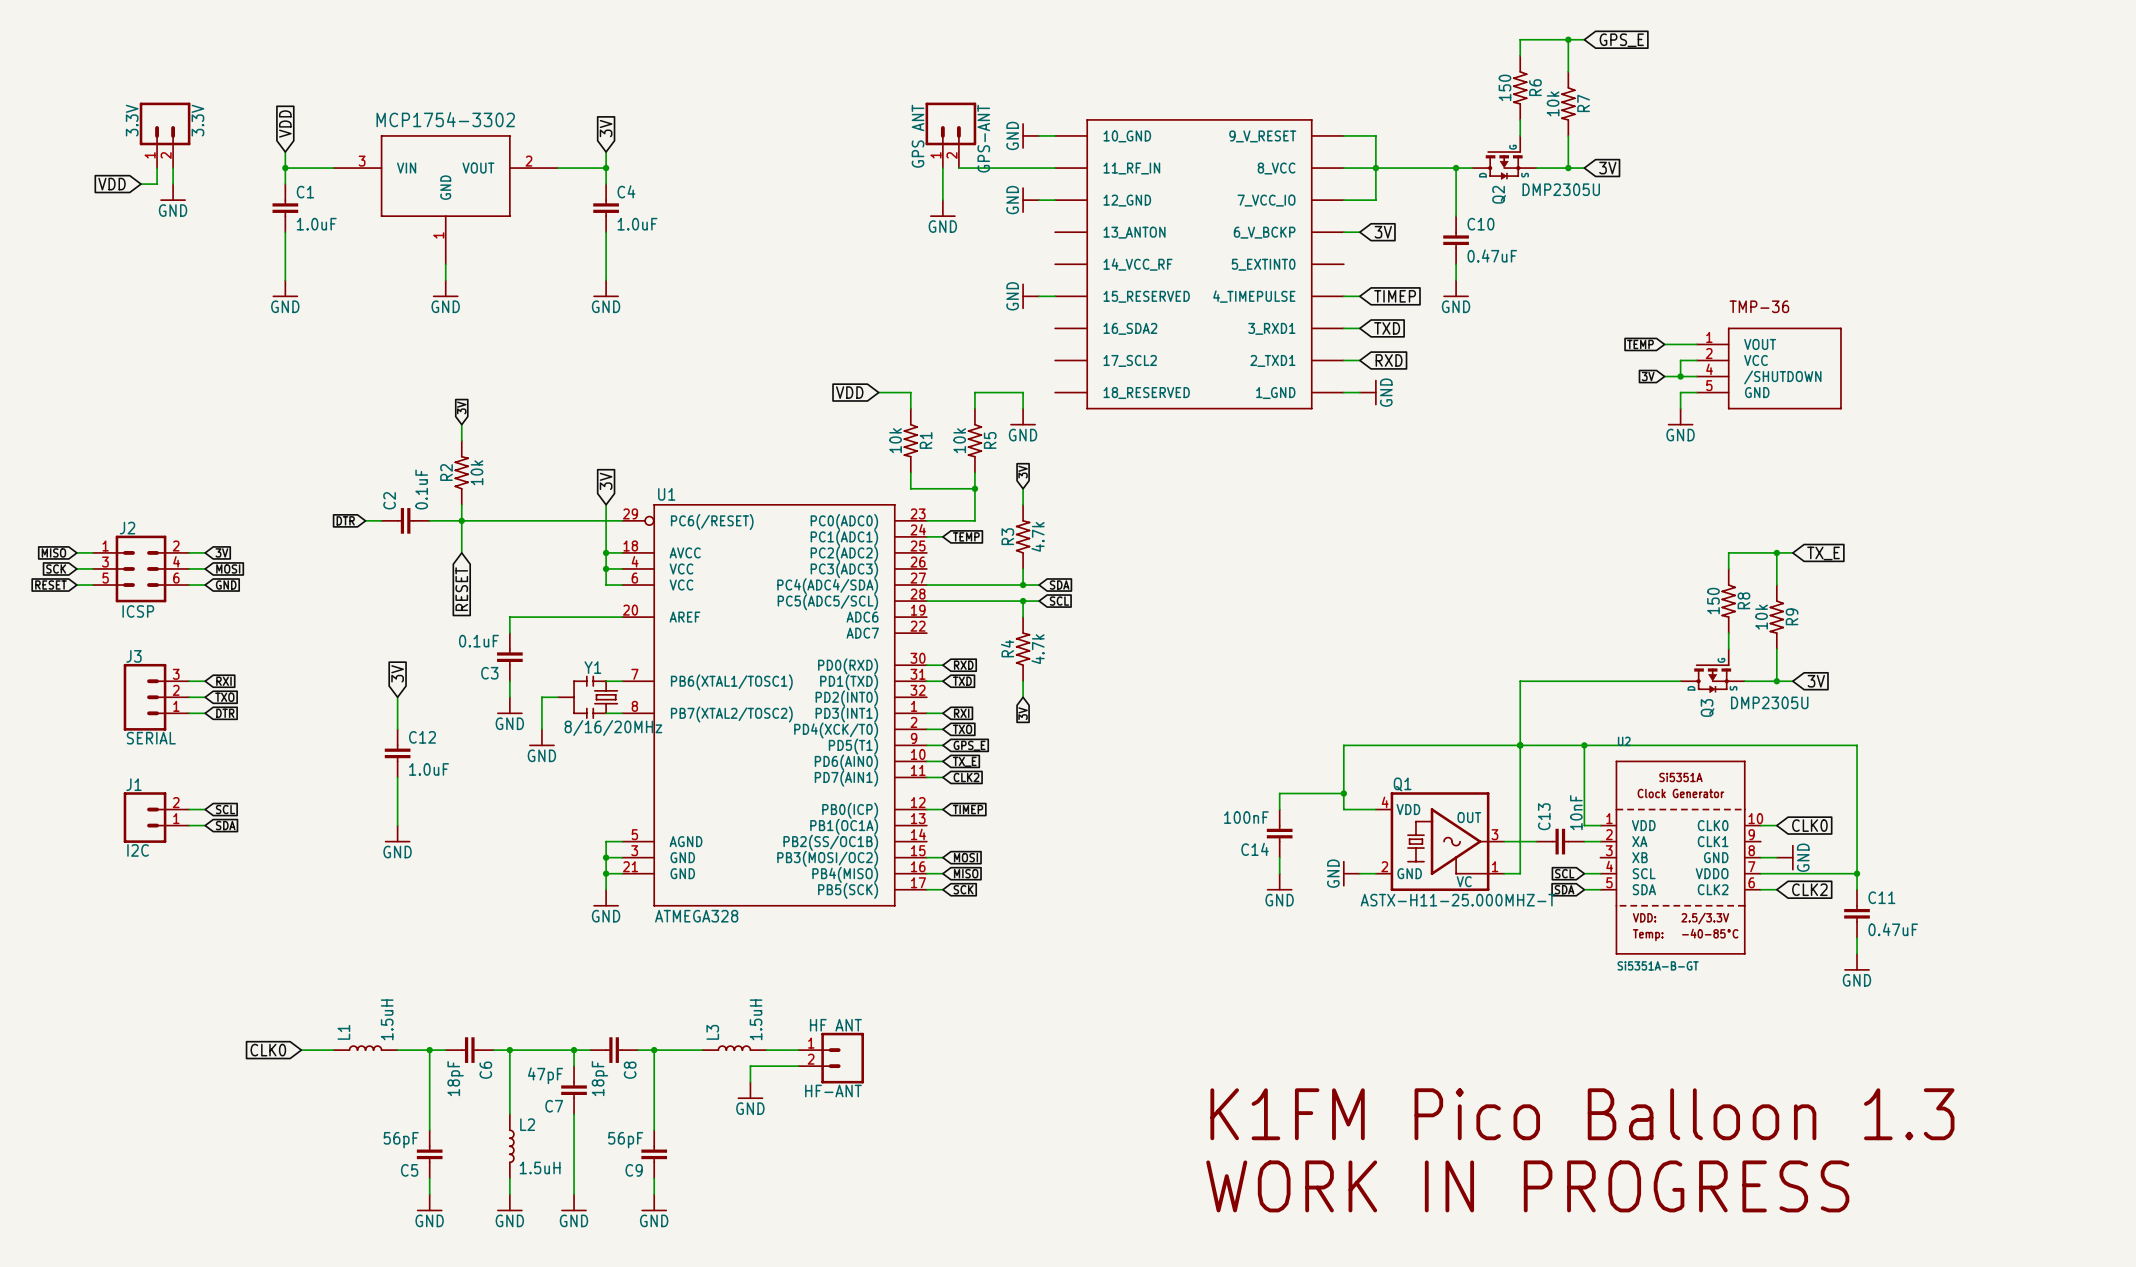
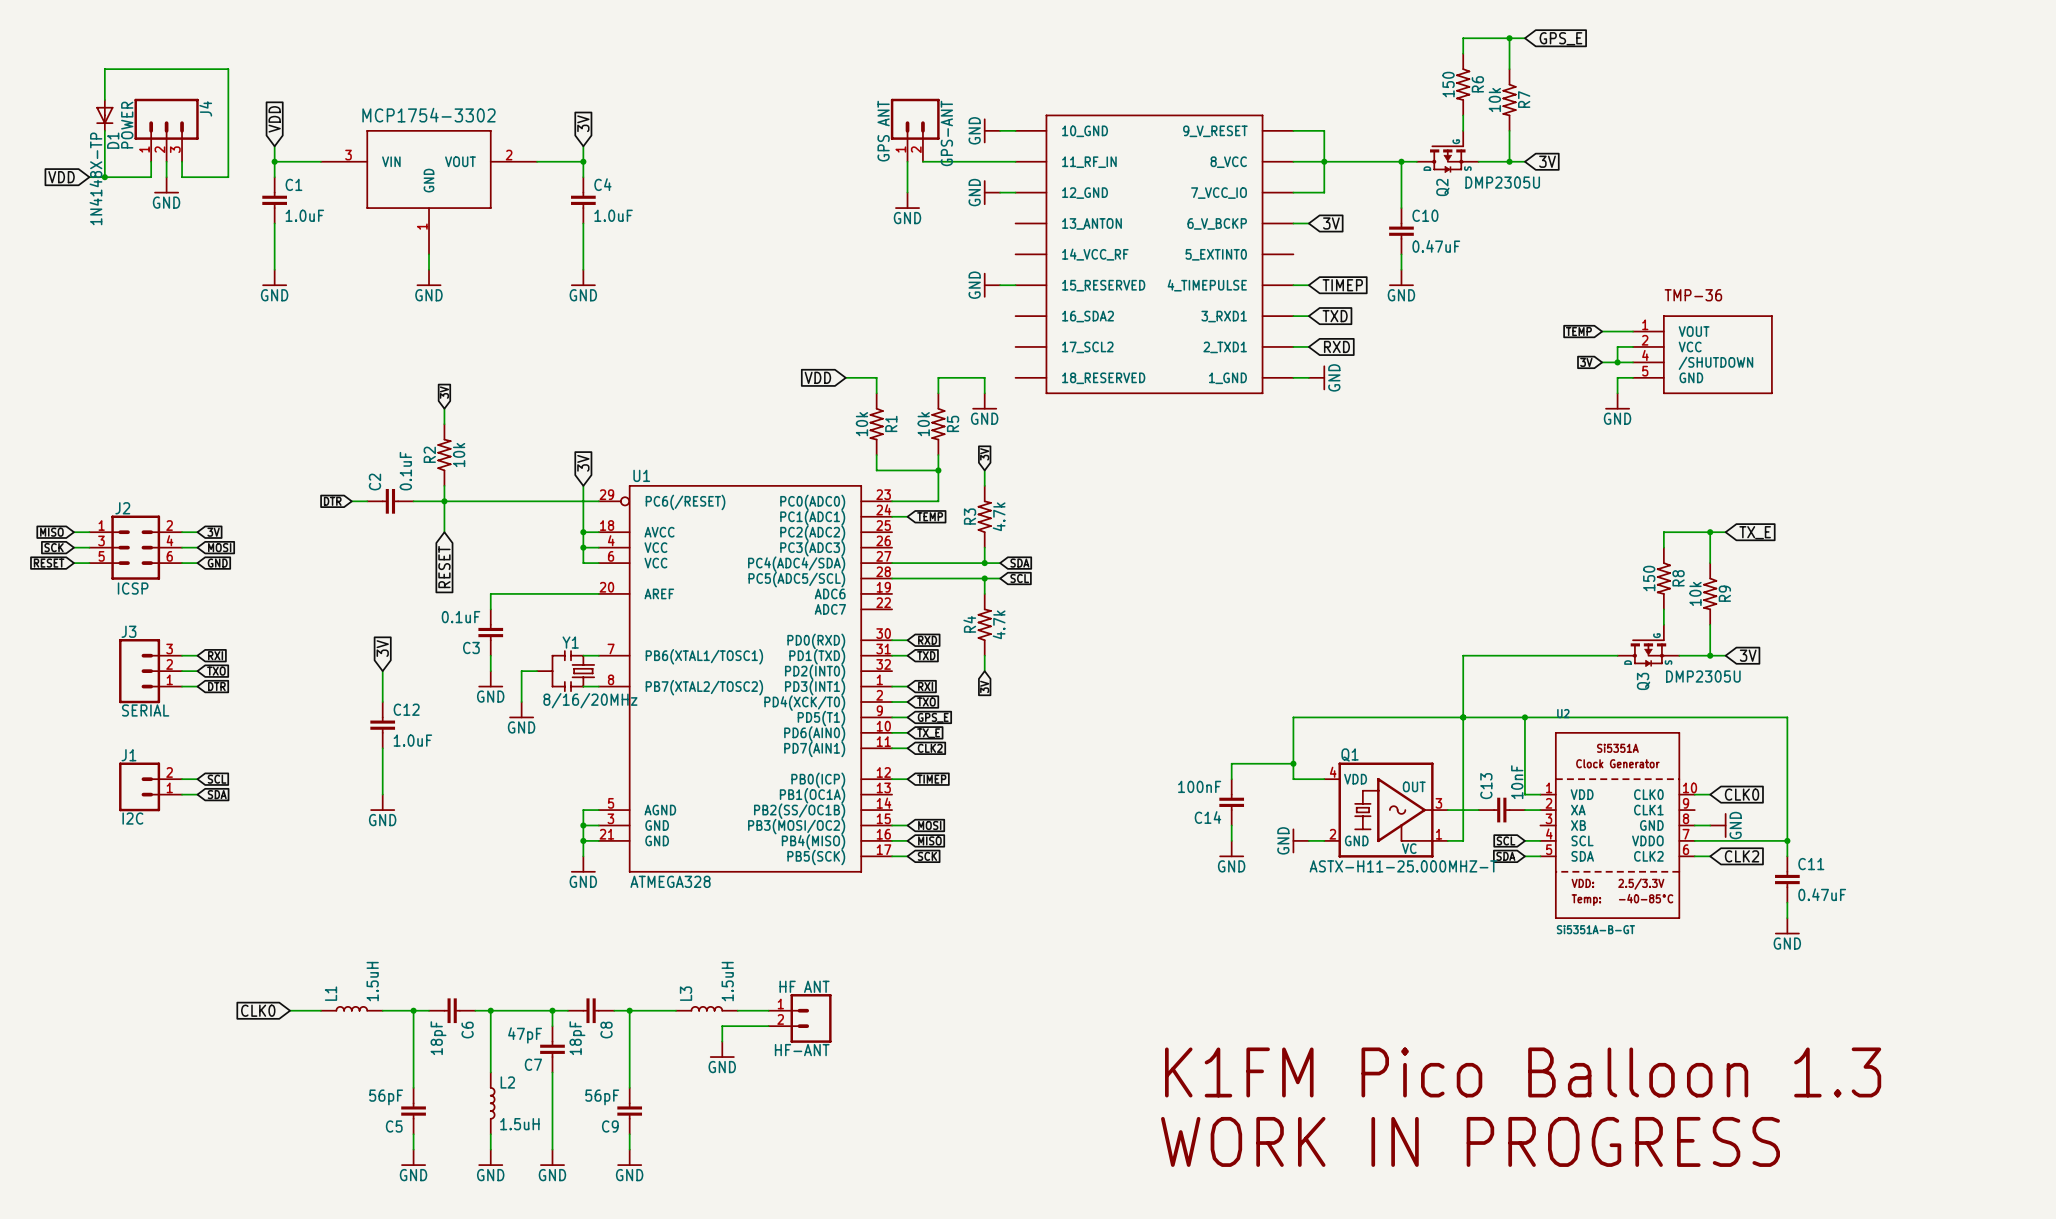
wire: none -> (104, 100) (104, 69) (228, 69) (228, 177) (182, 177) (182, 161)
D1: none -> 1N4148X-TP (104, 115)
wire: none -> (104, 130) (104, 177)
3.3V: 3.3V (165, 135) -> none
J4: none -> POWER (166, 130)
wire: none -> (89, 177) (135, 177)
junction: none -> (104, 177)
global label position: VDD (112, 184) -> VDD (61, 177)

